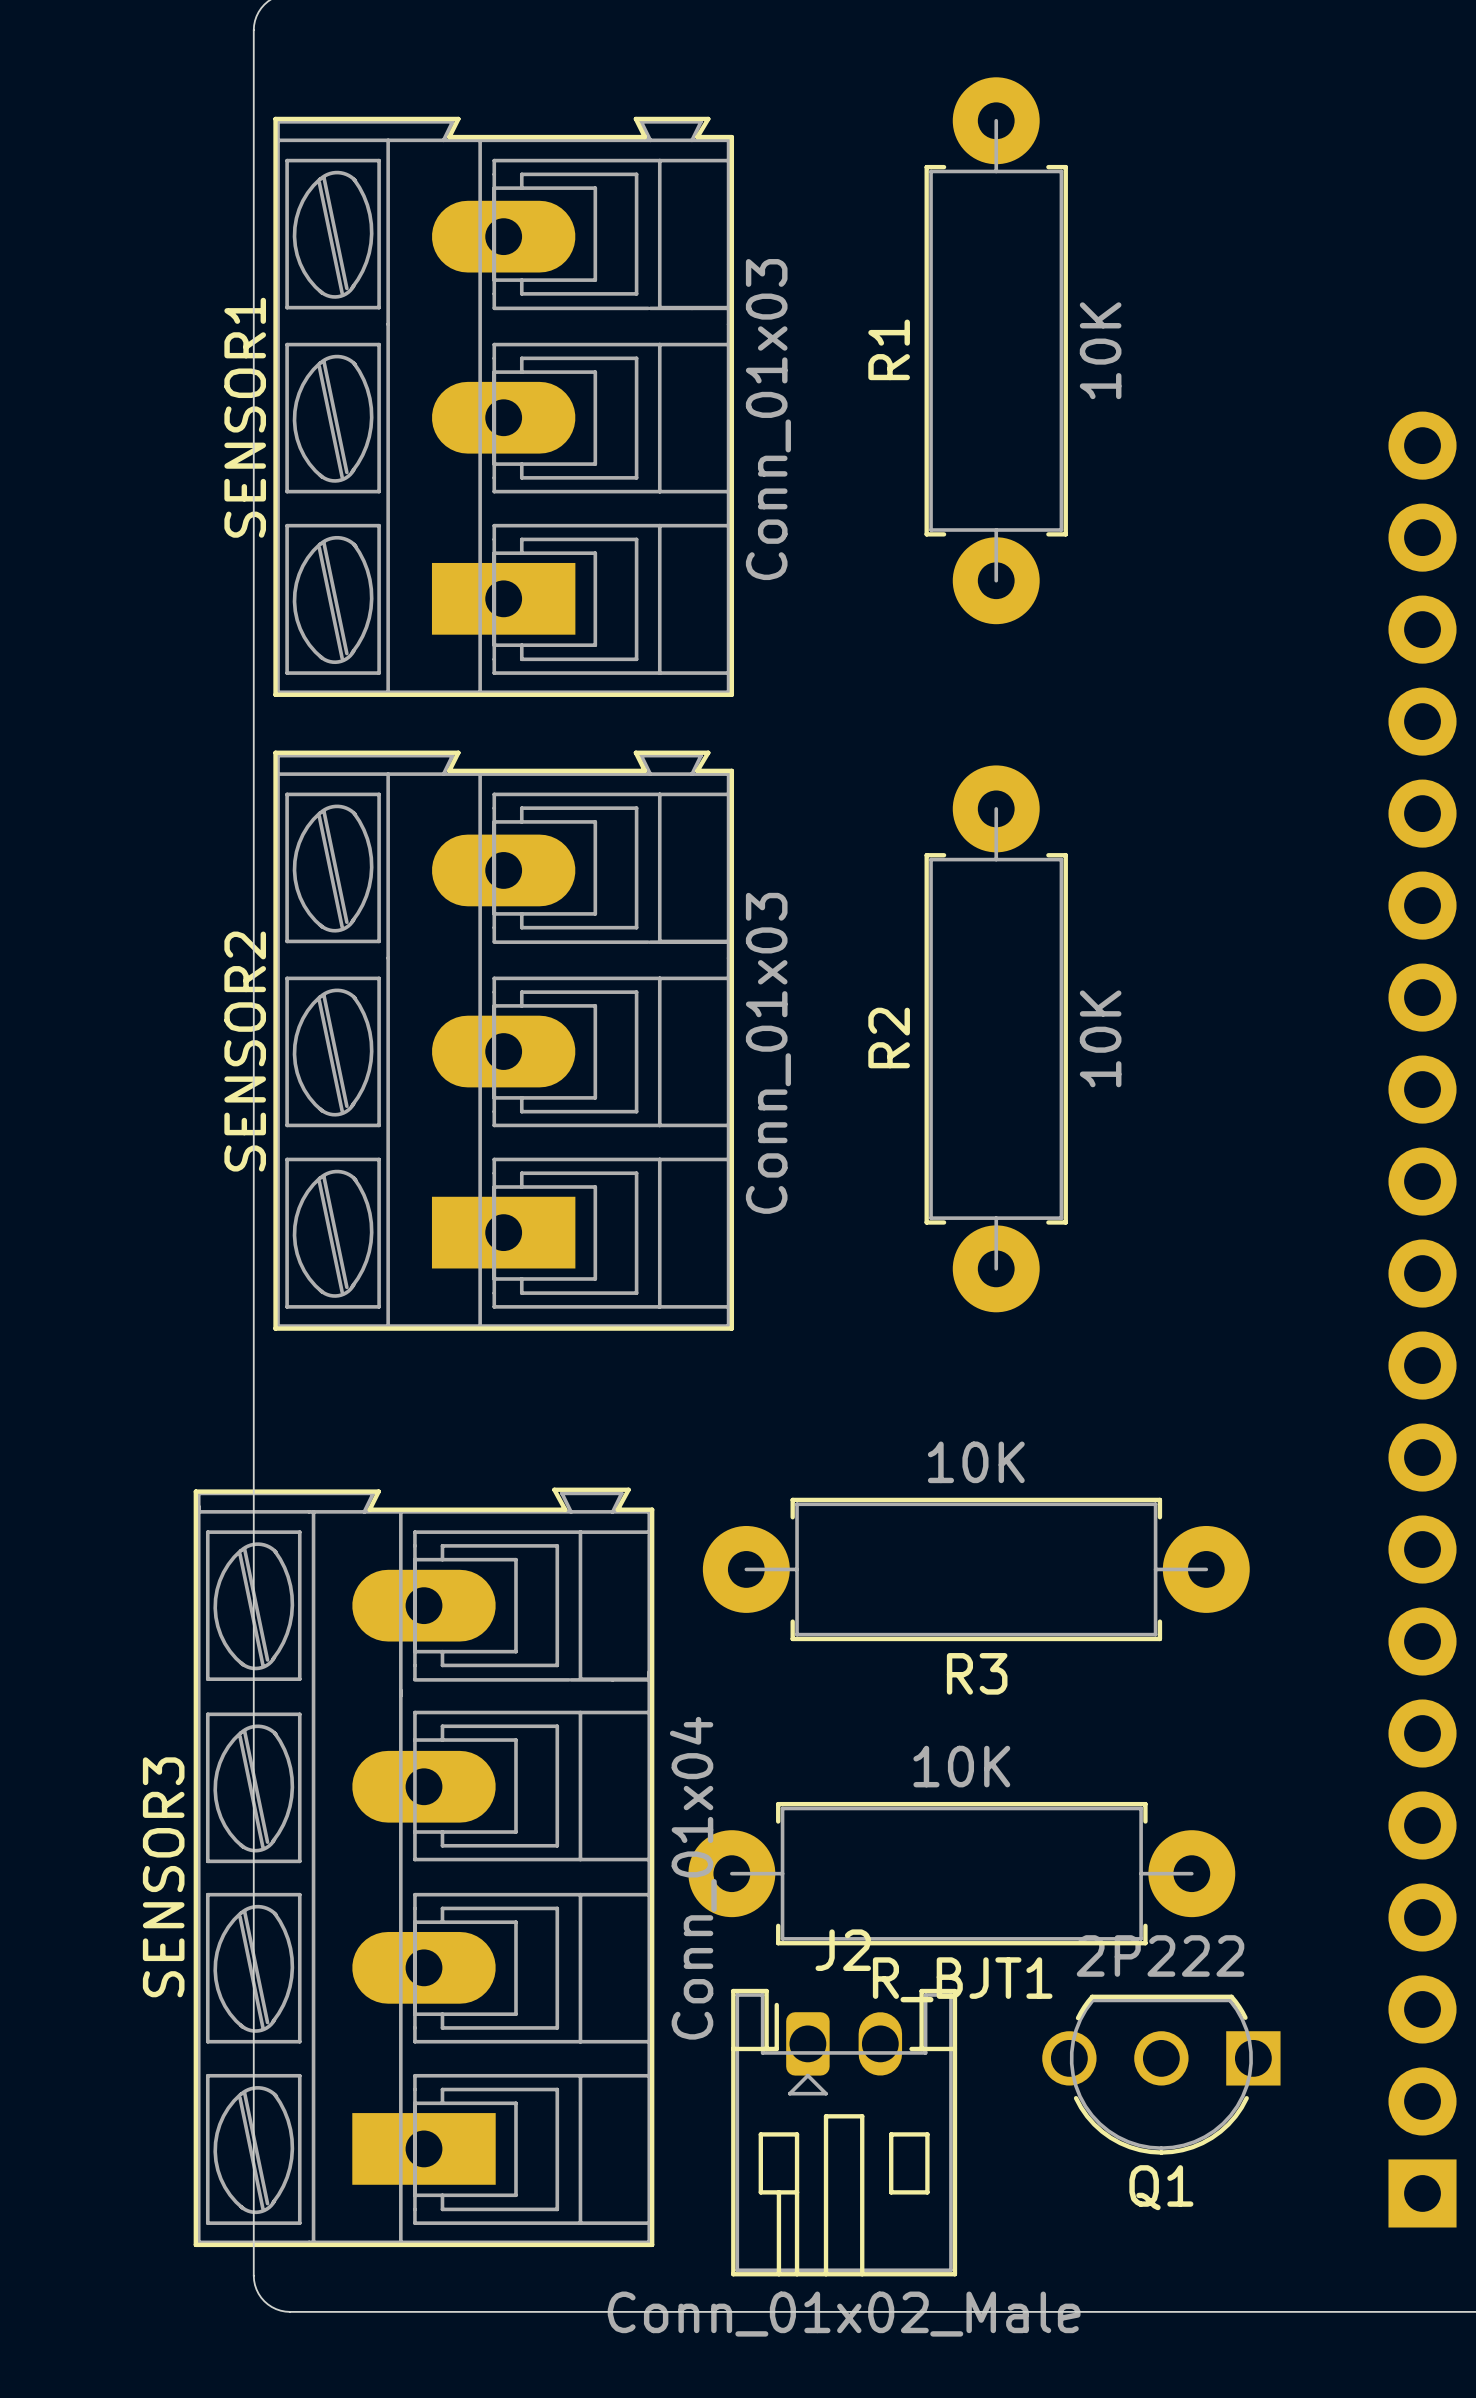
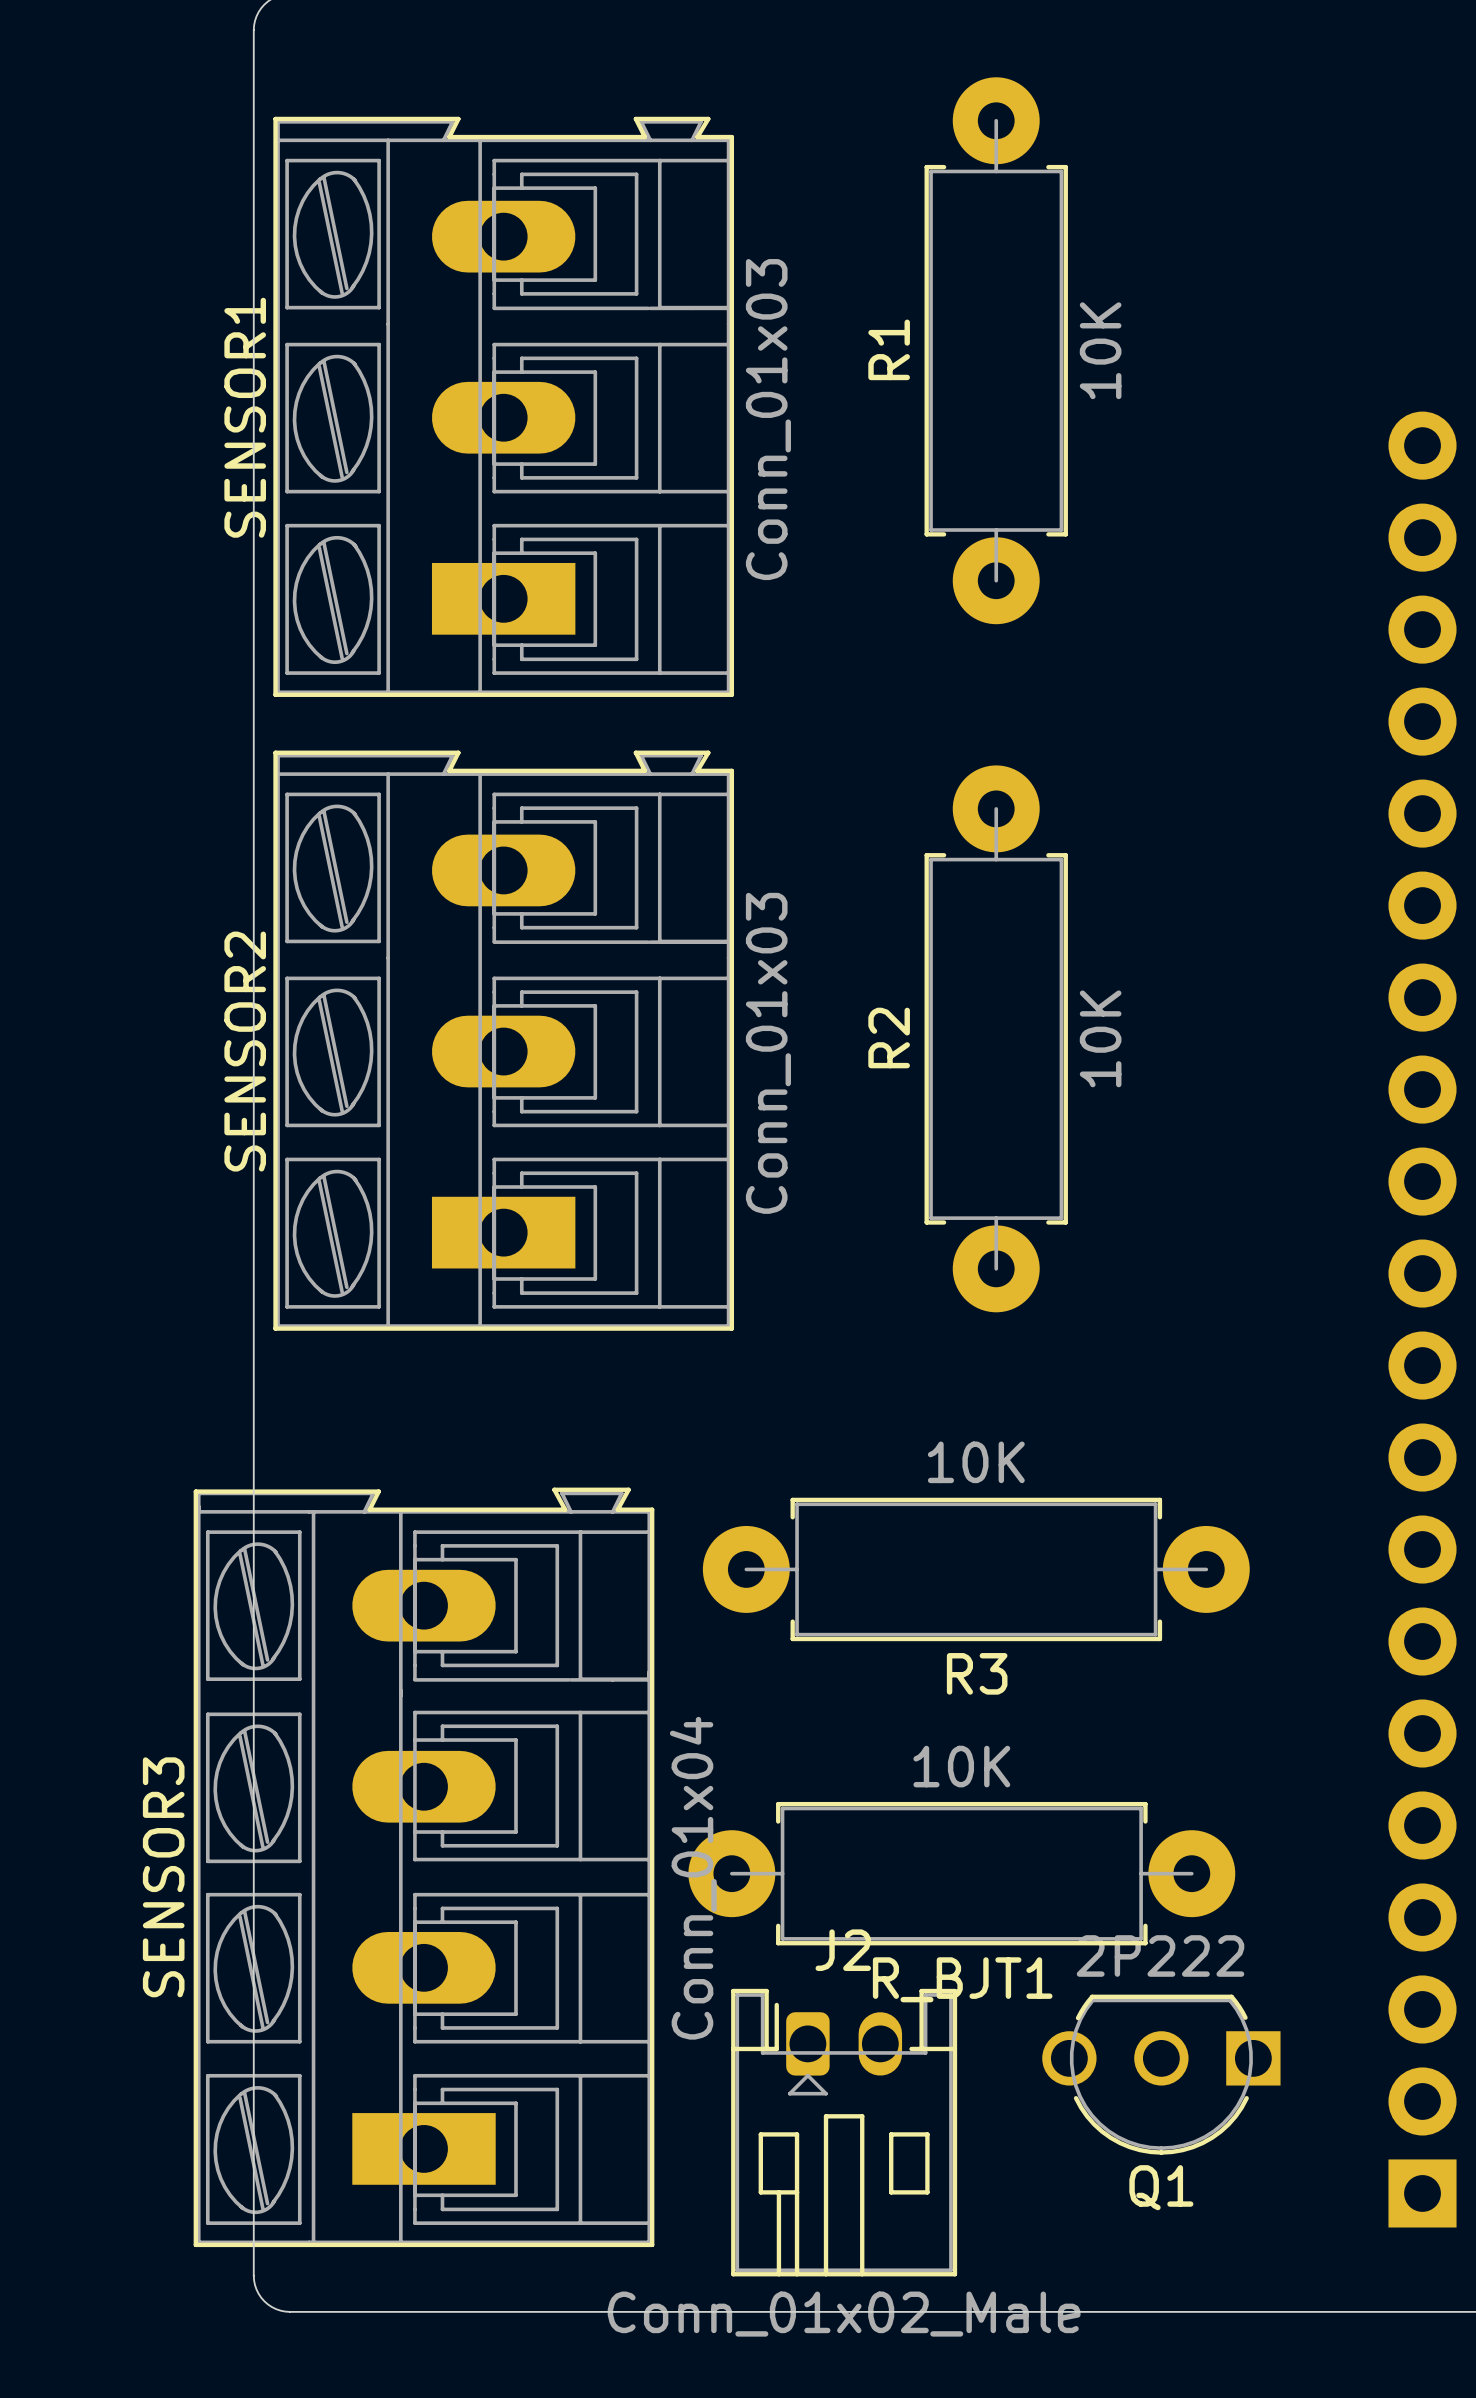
SENSOR1 footprint: [273, 116, 735, 697] -> [273, 116, 735, 697]
SENSOR2 footprint: [273, 750, 735, 1331] -> [273, 750, 735, 1331]
SENSOR3 footprint: [193, 1487, 655, 2248] -> [193, 1487, 655, 2248]

